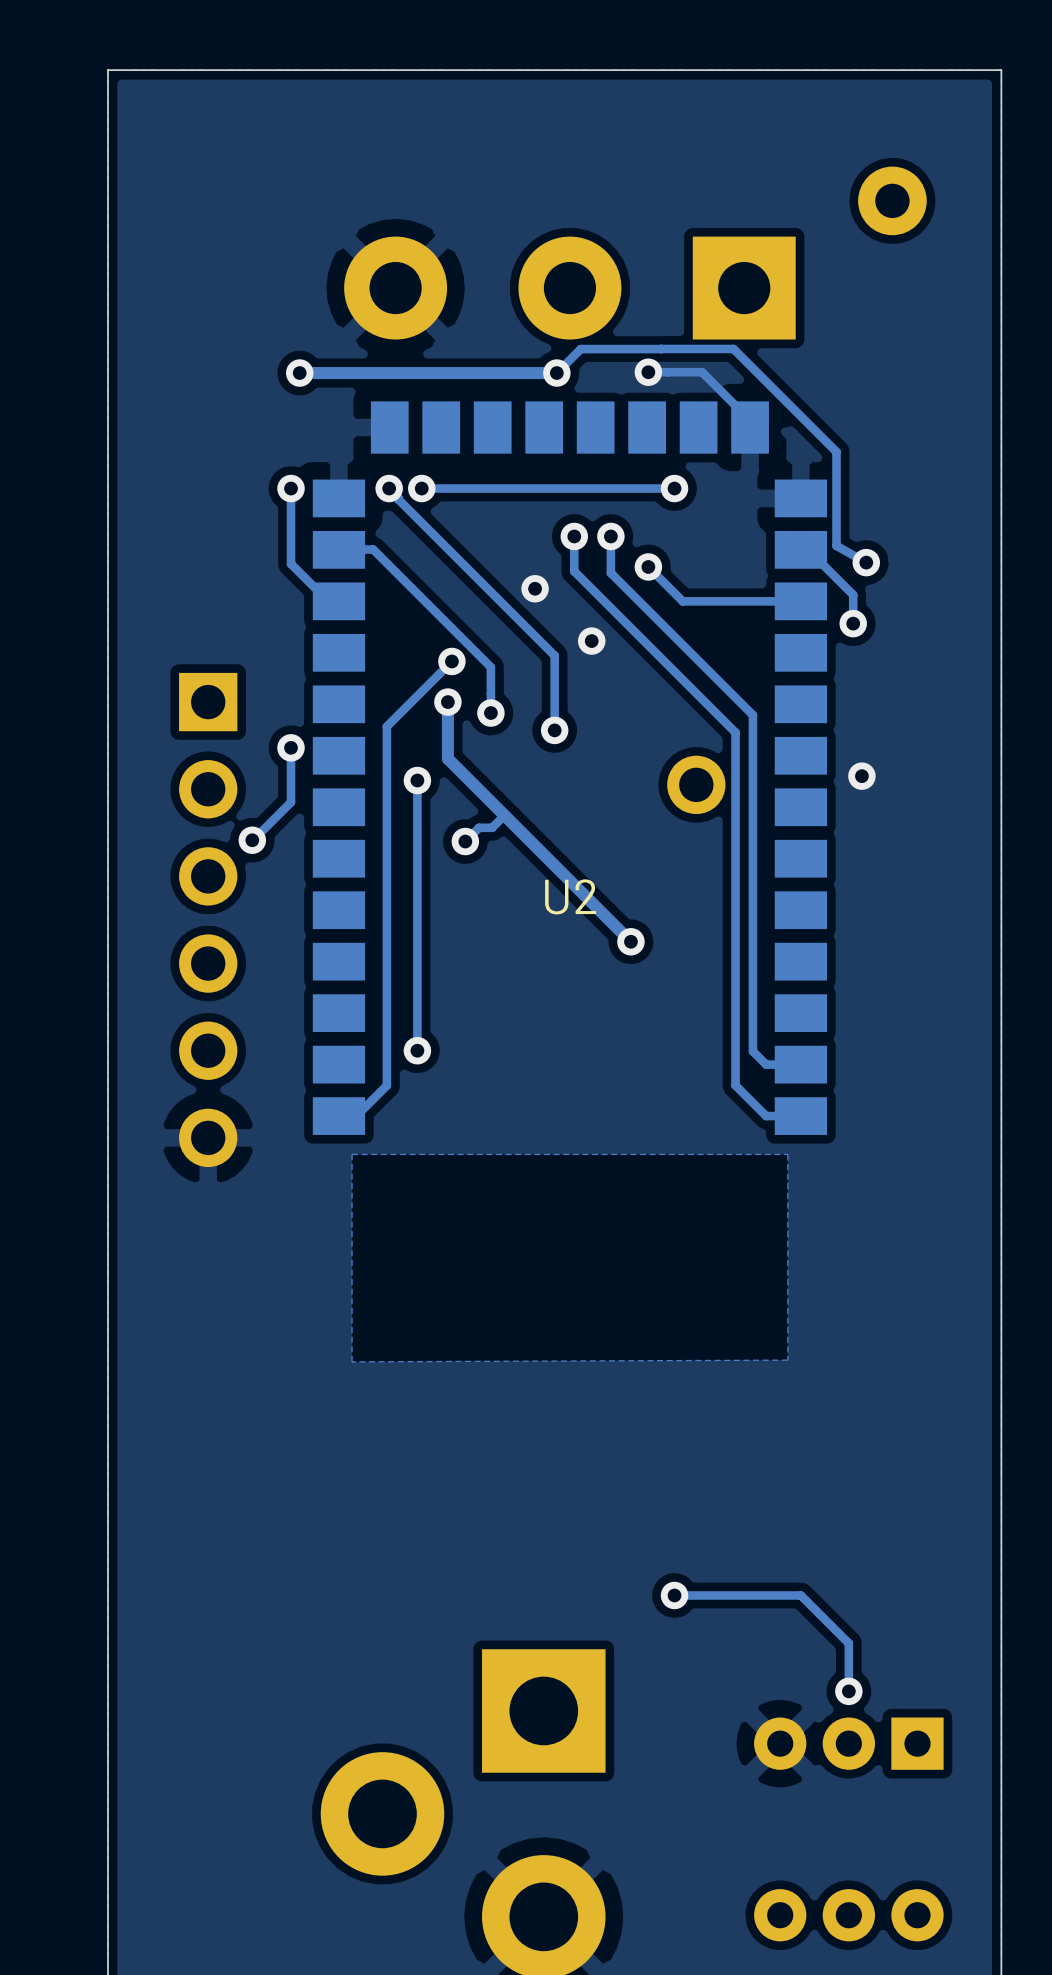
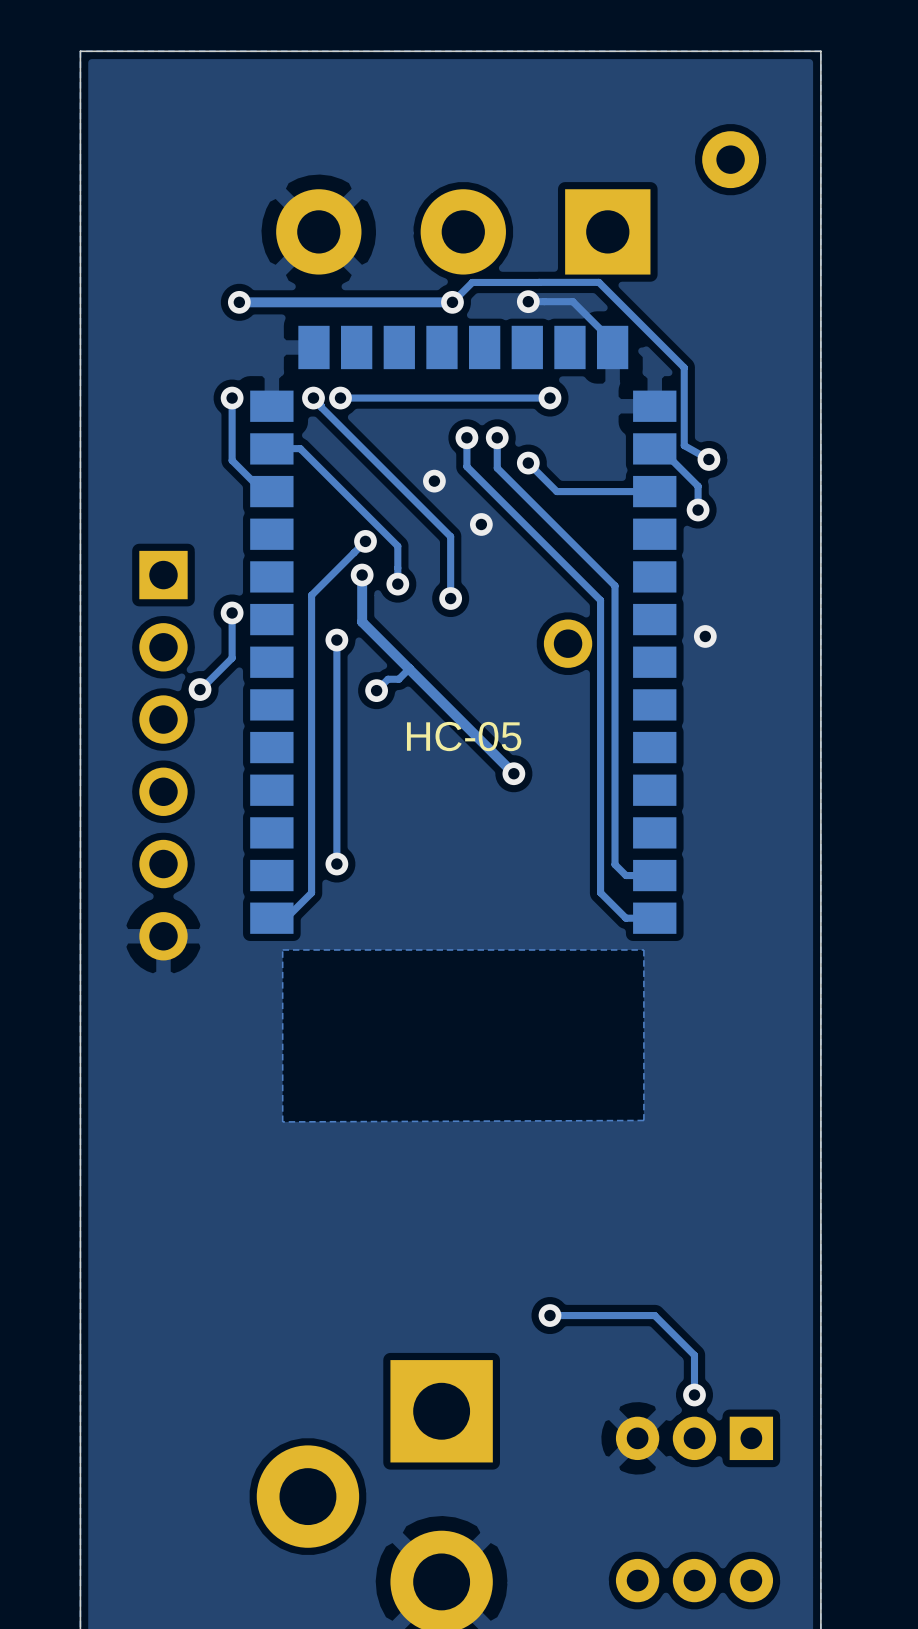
U2 name: U2 (570, 896) -> HC-05 (464, 736)

